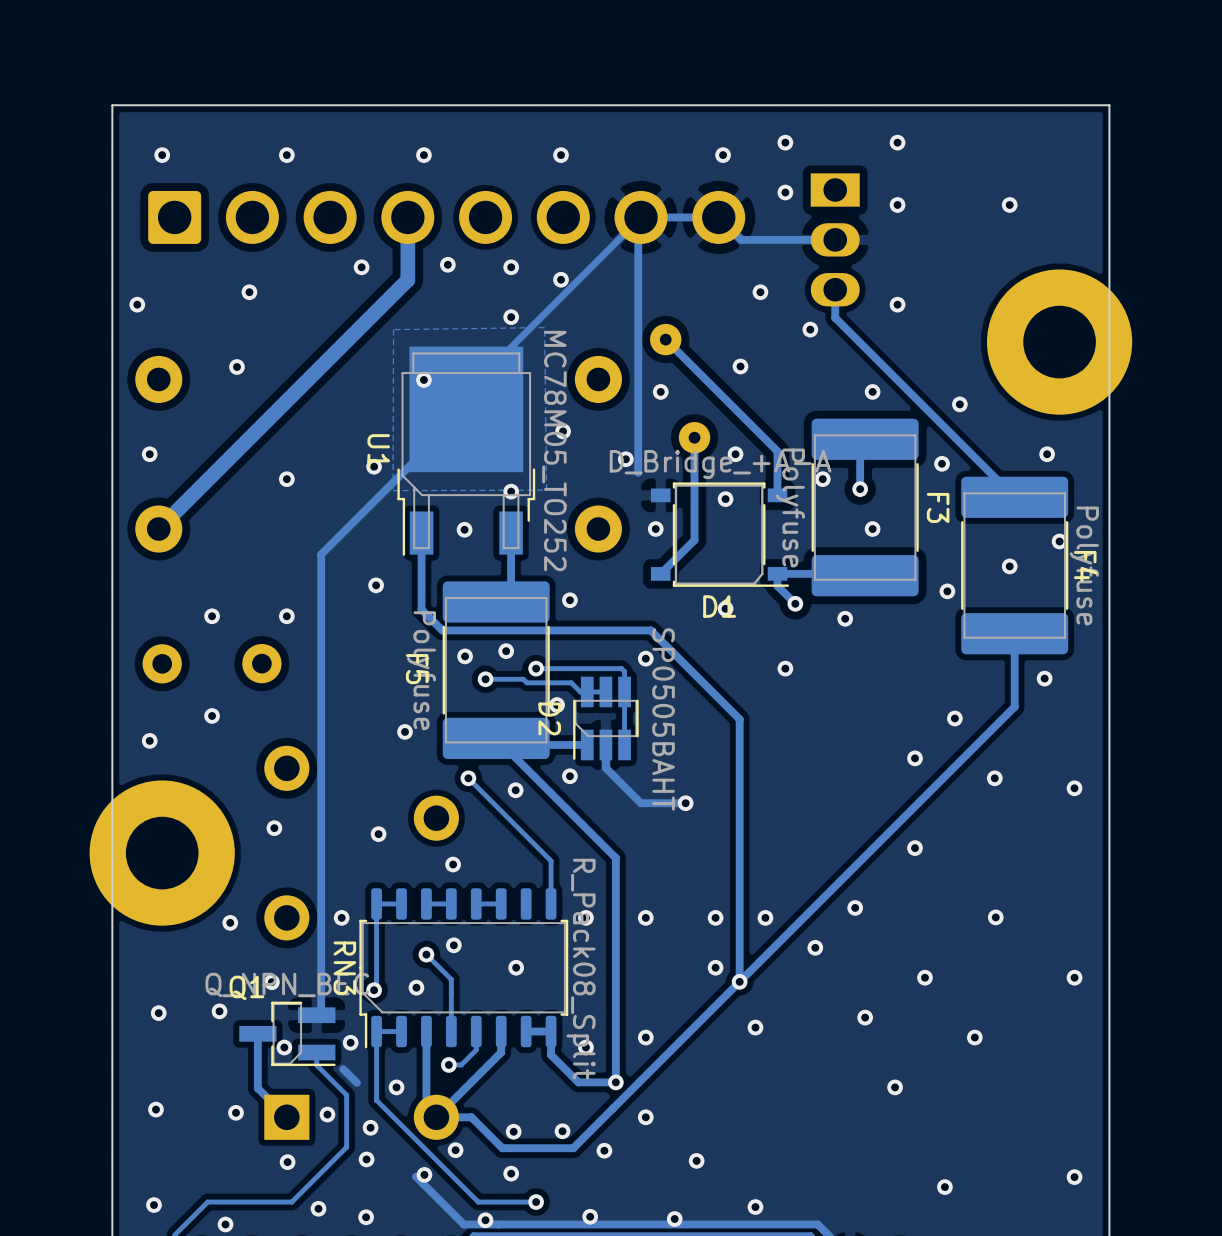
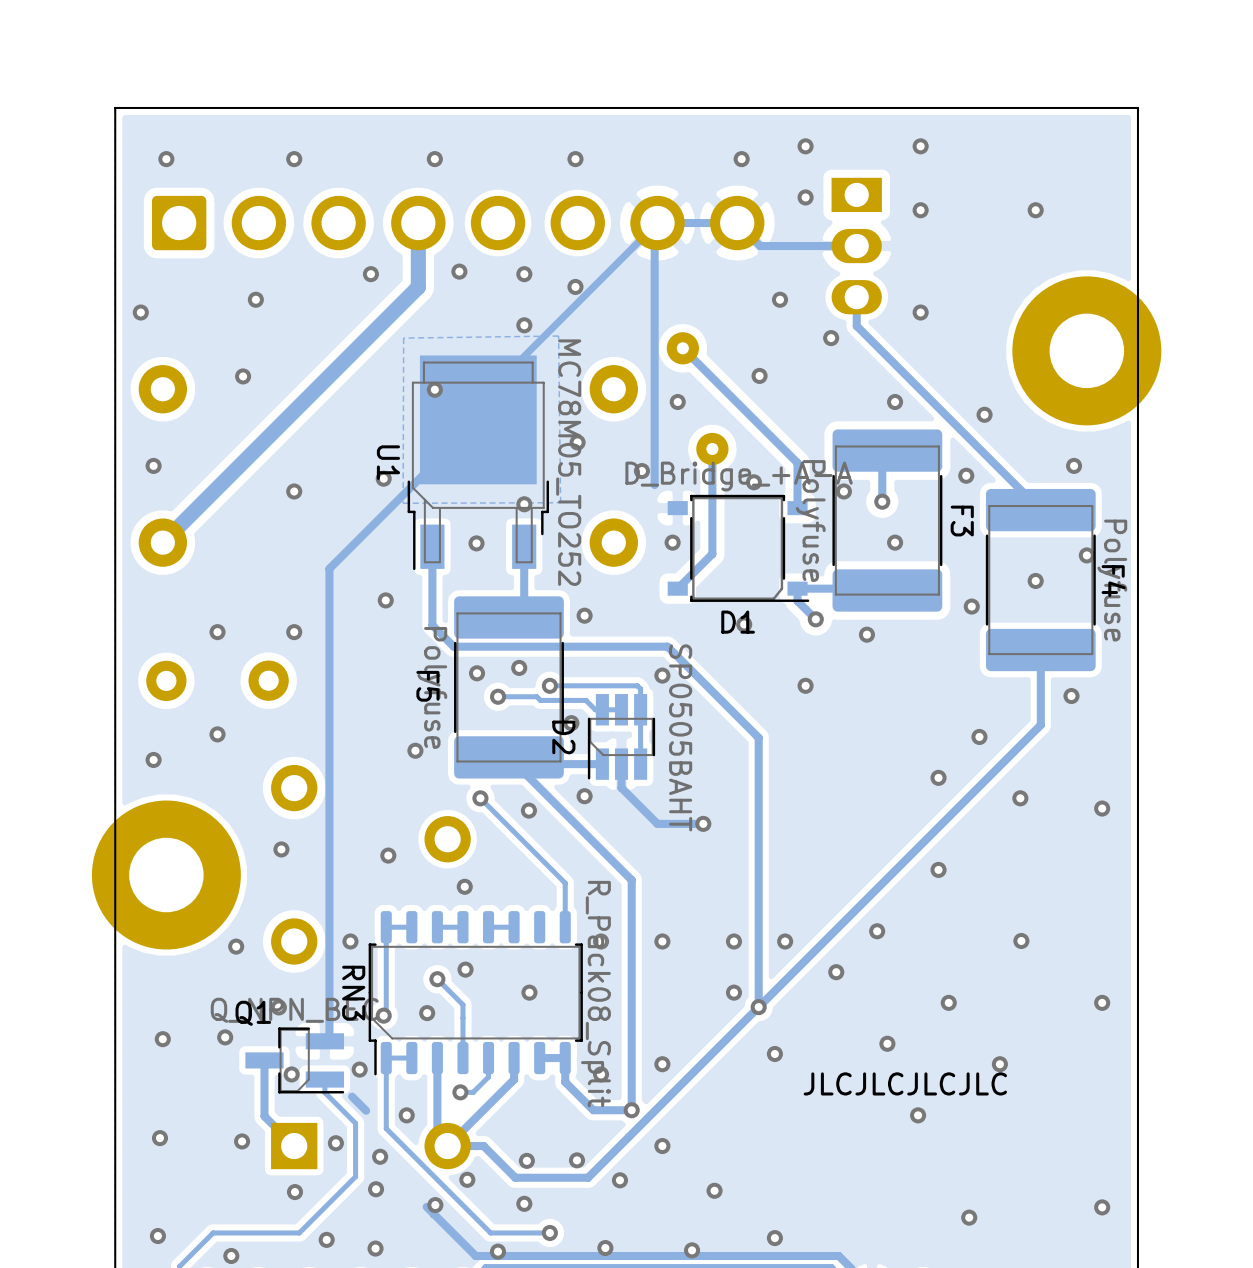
via: (735, 454) -> none
via: none -> (753, 482)
via: (725, 499) -> none
text: none -> JLCJLCJLCJLC (905, 1083)

